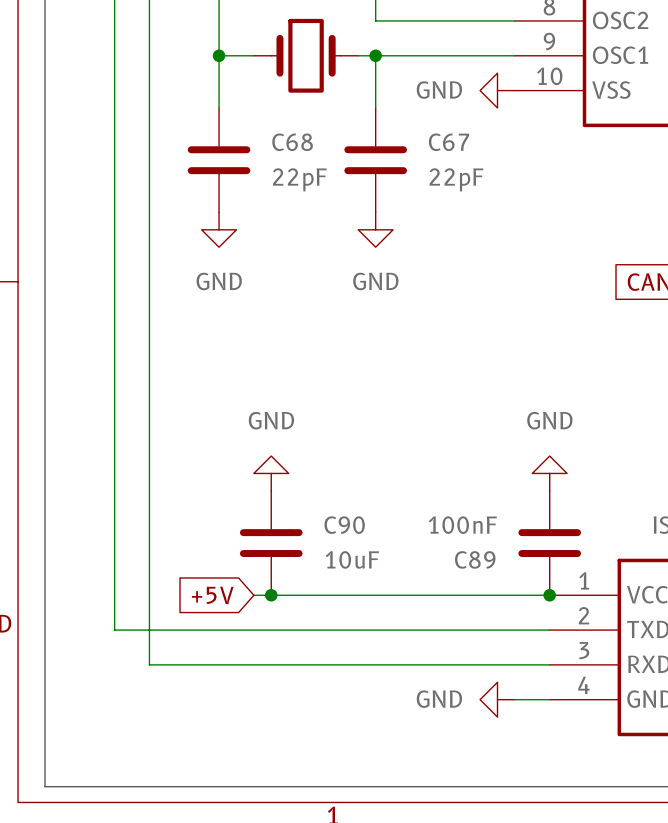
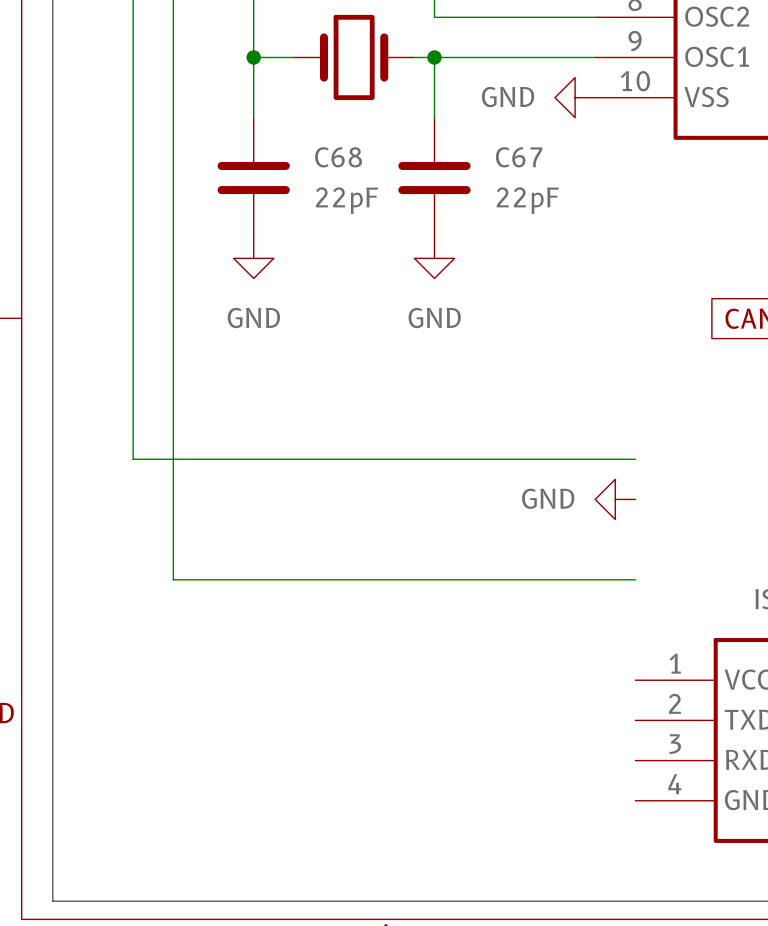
wire: (114, 403) (114, 630) (549, 630) -> (133, 459) (635, 459)
power symbol: GND (271, 473) -> none
power symbol rotation: 0° (549, 473) -> 90° counterclockwise (615, 499)
power symbol position: GND (549, 473) -> GND (615, 499)
wire: (149, 508) (149, 664) (549, 664) -> (173, 579) (635, 579)
C90: 10uF (271, 543) -> none
C89: 100nF (549, 543) -> none
global label: +5V (212, 595) -> none
wire: (253, 595) (549, 595) -> none
junction: (271, 595) -> none
junction: (549, 595) -> none
power symbol: GND (497, 699) -> none
wire: (514, 699) (549, 699) -> none

